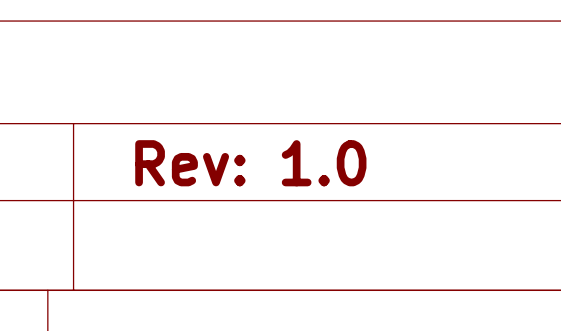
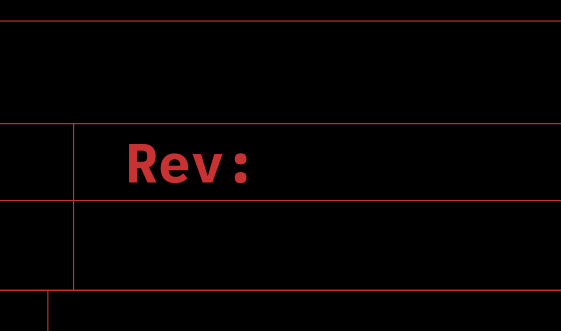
title block: Rev: 1.0 (250, 163) -> Rev: (187, 163)

